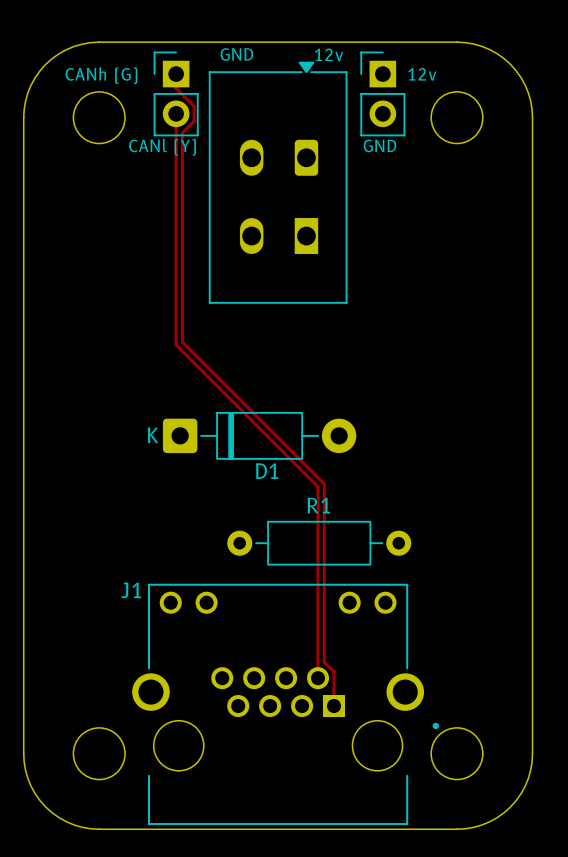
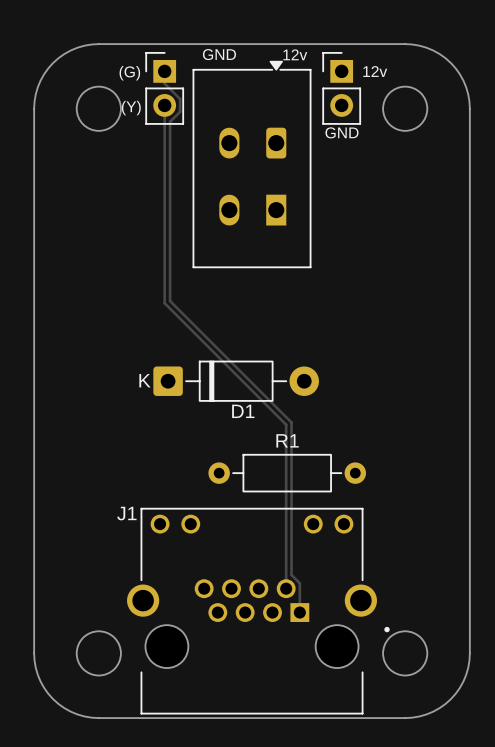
text: CANh (G) (101, 75) -> none
text: none -> (G) (129, 73)
text: none -> (Y) (131, 108)
text: CANl (Y) (162, 147) -> none

